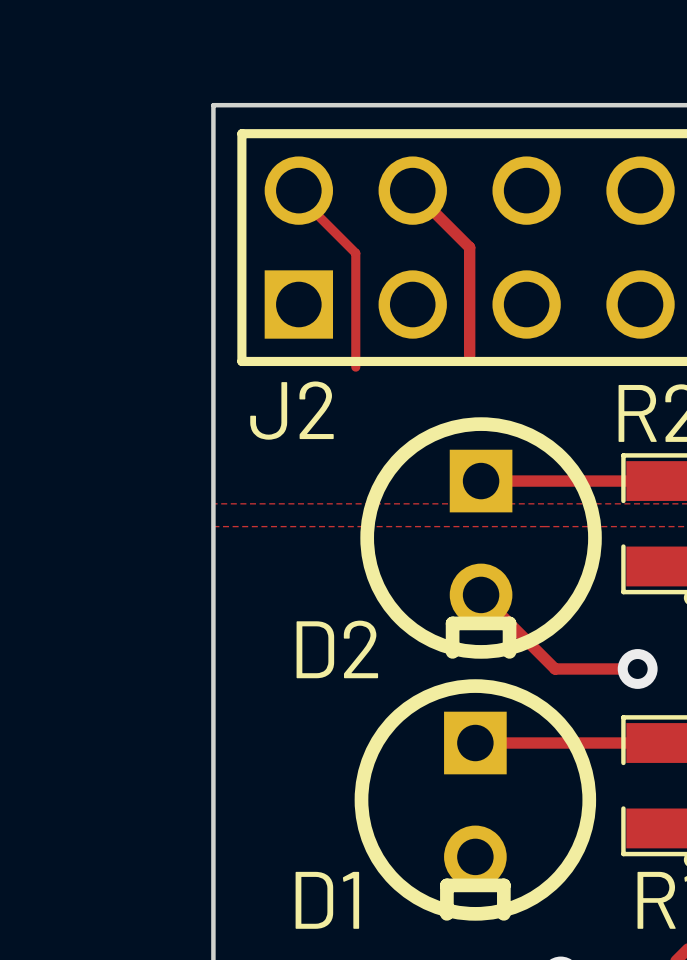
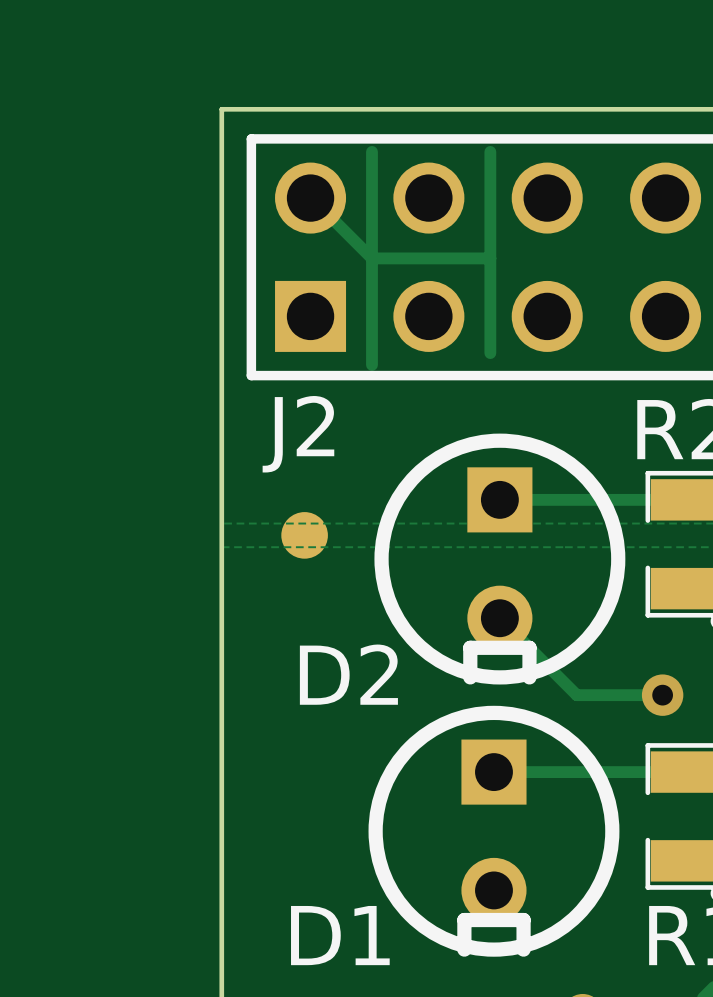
track: none -> (371, 151) (371, 364)
track: none -> (490, 151) (490, 353)
track: (298, 190) (298, 196) (355, 253) (355, 367) -> (310, 198) (371, 258) (490, 258)
track: (412, 190) (469, 247) (469, 355) -> none
part: none -> (304, 535)

